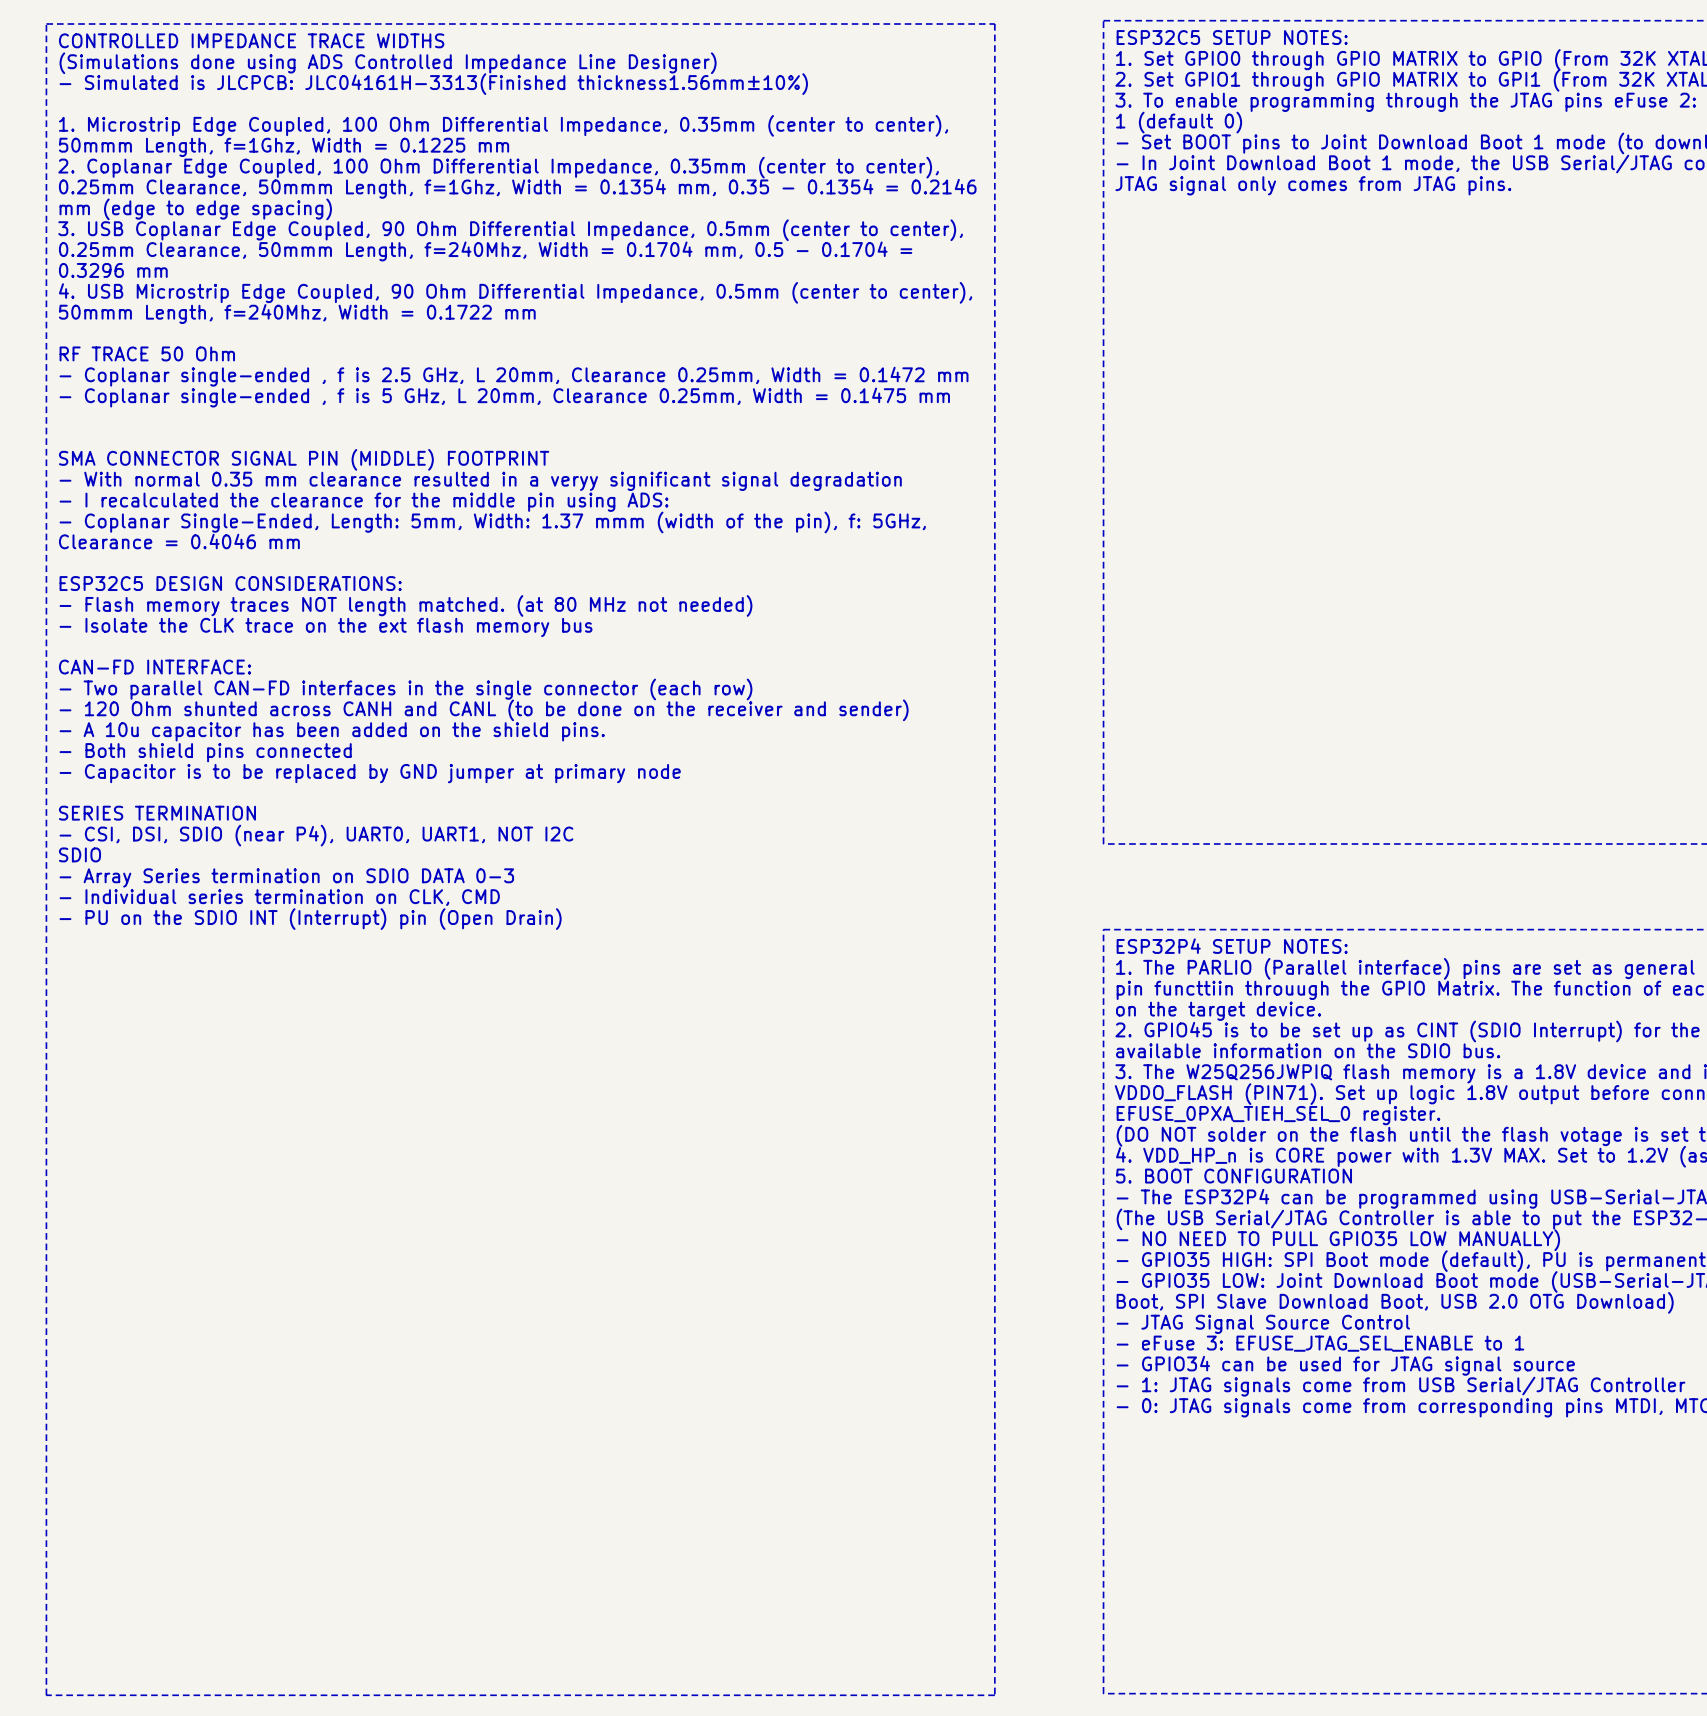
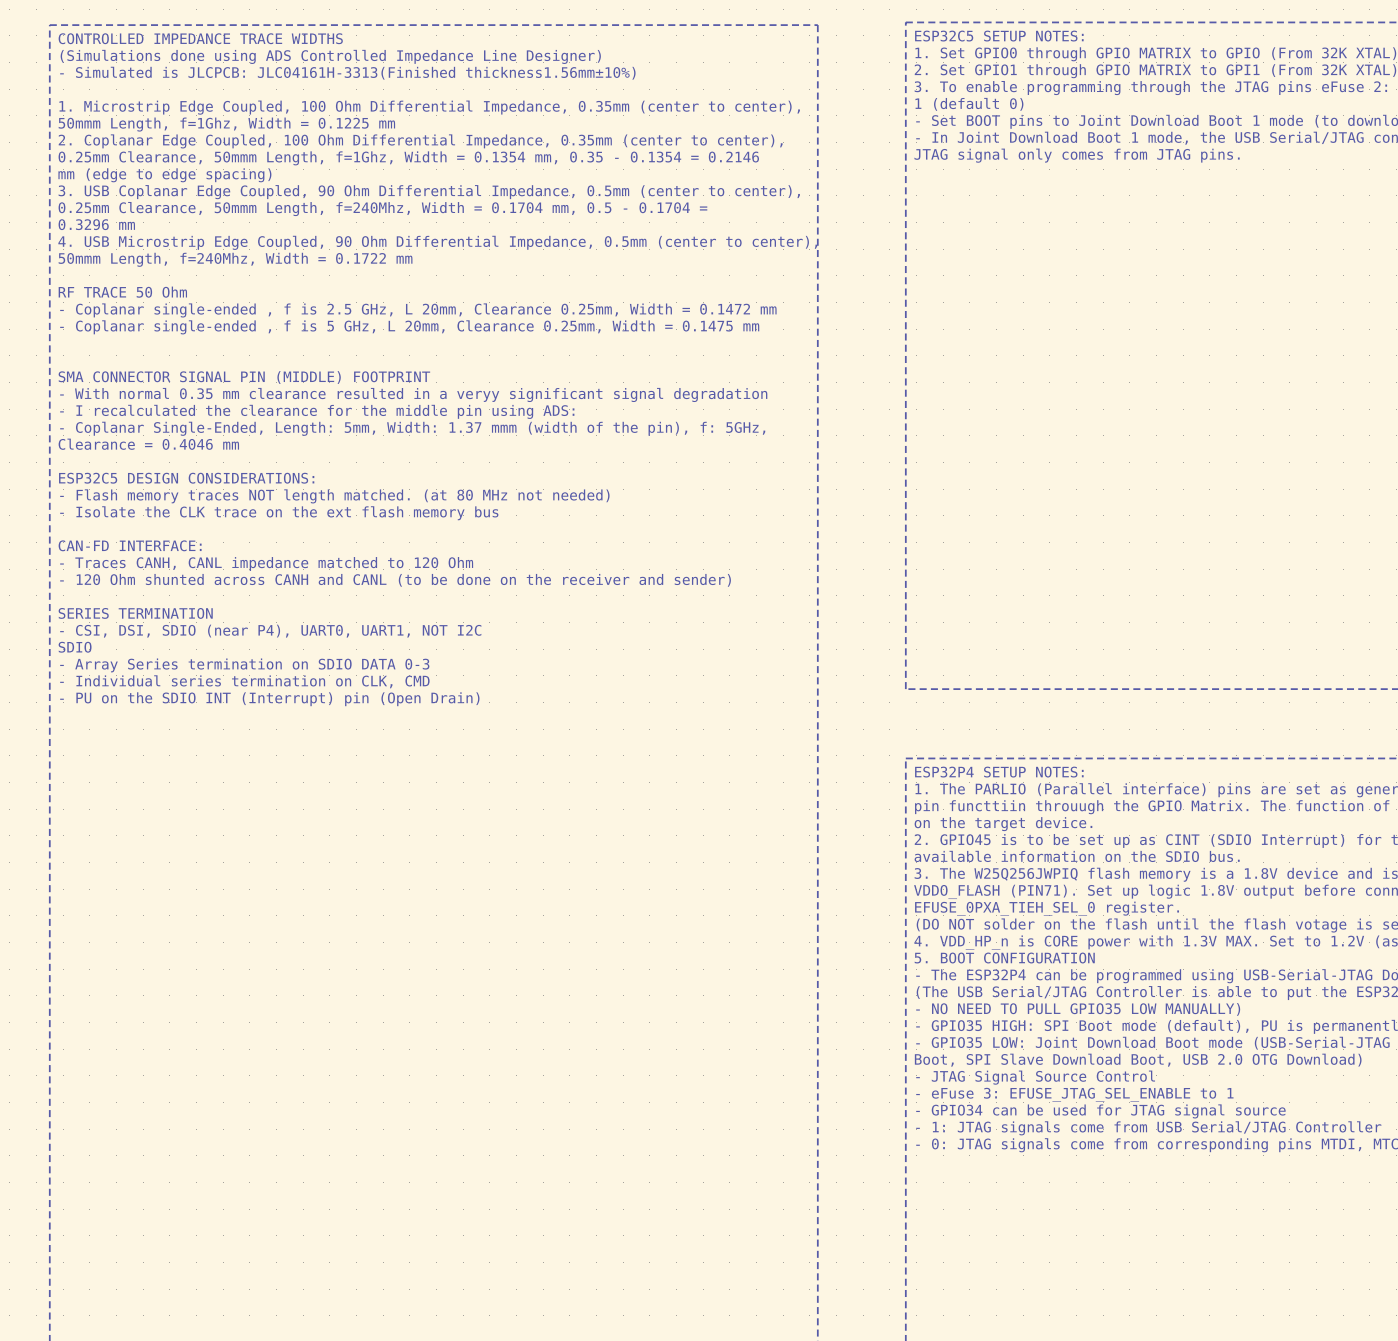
text: - Two parallel CAN-FD interfaces in the single connector (each row) (405, 689) -> - Traces CANH, CANL impedance matched to 120 Ohm (266, 563)
text: - A 10u capacitor has been added on the shield pins. (332, 731) -> none
text: - Both shield pins connected (205, 752) -> SERIES TERMINATION (135, 613)
text: - Capacitor is to be replaced by GND jumper at primary node (370, 773) -> - CSI, DSI, SDIO (near P4), UART0, UART1, NOT I2C (270, 631)
text: none -> SDIO (75, 647)
text: SERIES TERMINATION (157, 813) -> - Array Series termination on SDIO DATA 0-3 (244, 665)
text: - CSI, DSI, SDIO (near P4), UART0, UART1, NOT I2C (316, 835) -> - Individual series termination on CLK, CMD (244, 681)
text: SDIO (79, 854) -> - PU on the SDIO INT (Interrupt) pin (Open Drain) (269, 699)
text: - Array Series termination on SDIO DATA 0-3 (286, 877) -> none
text: - Individual series termination on CLK, CMD (279, 897) -> none
text: - PU on the SDIO INT (Interrupt) pin (Open Drain) (310, 919) -> none

